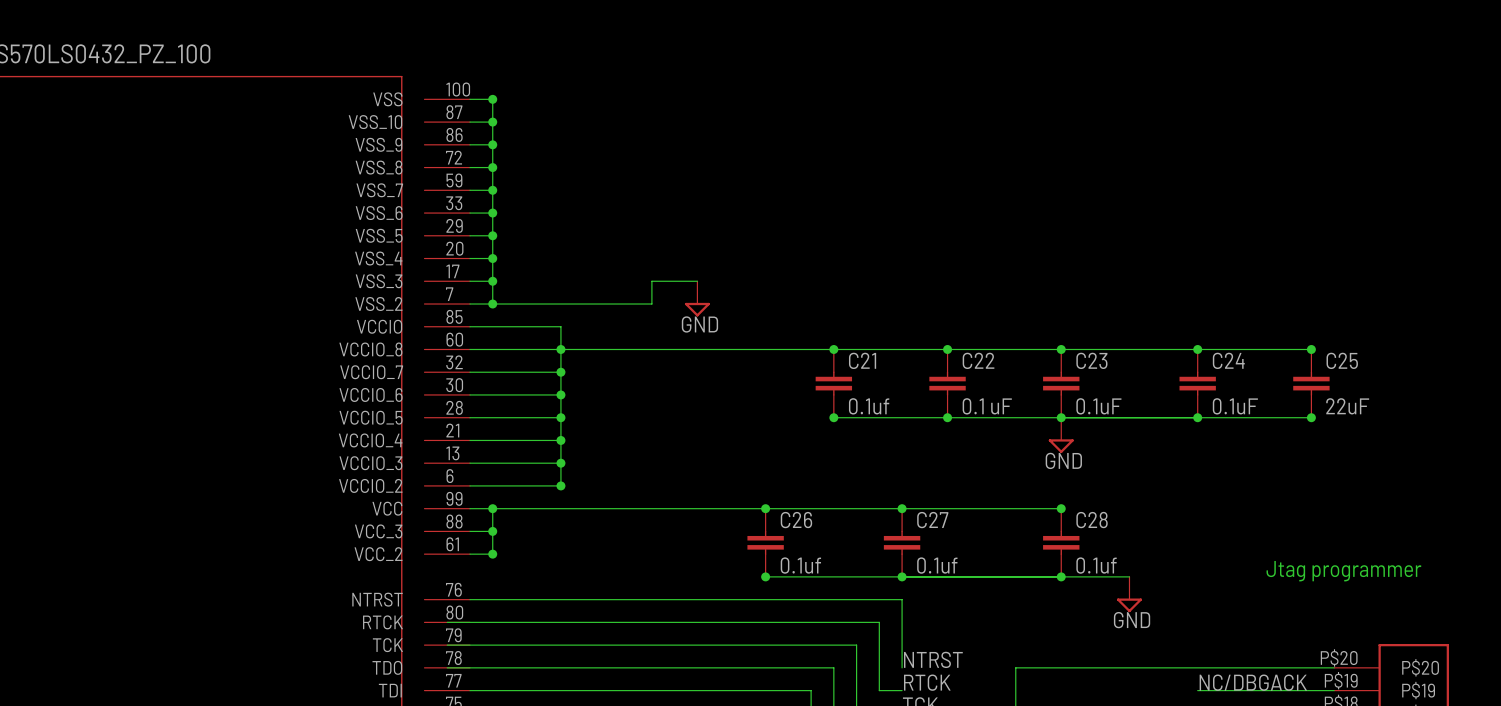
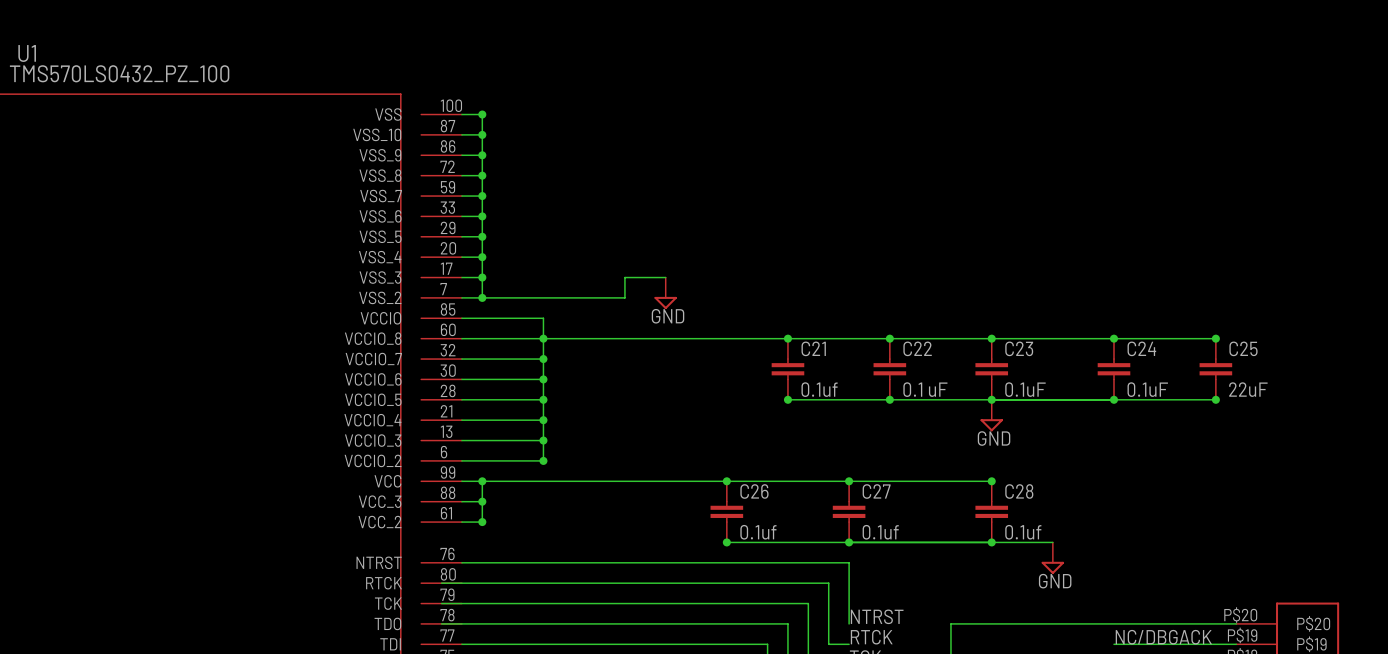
text: Jtag programmer (1343, 571) -> none

